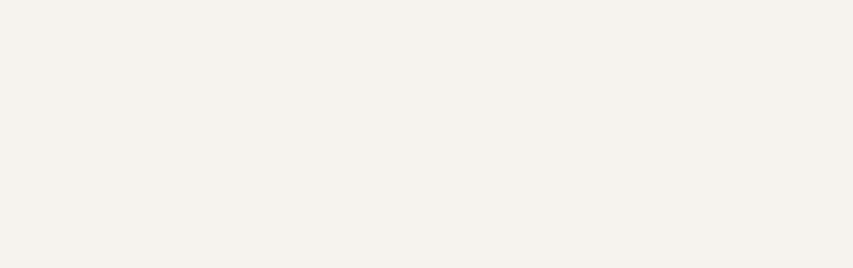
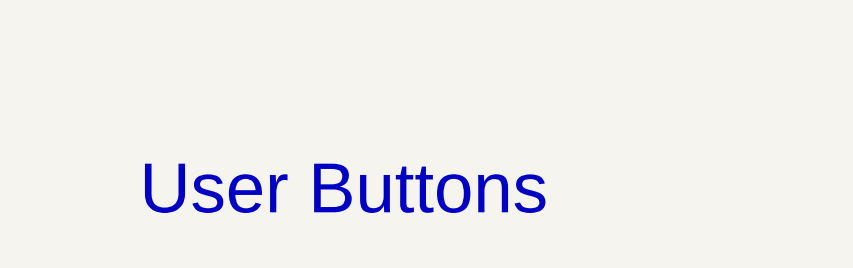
text: none -> User Buttons (345, 188)

